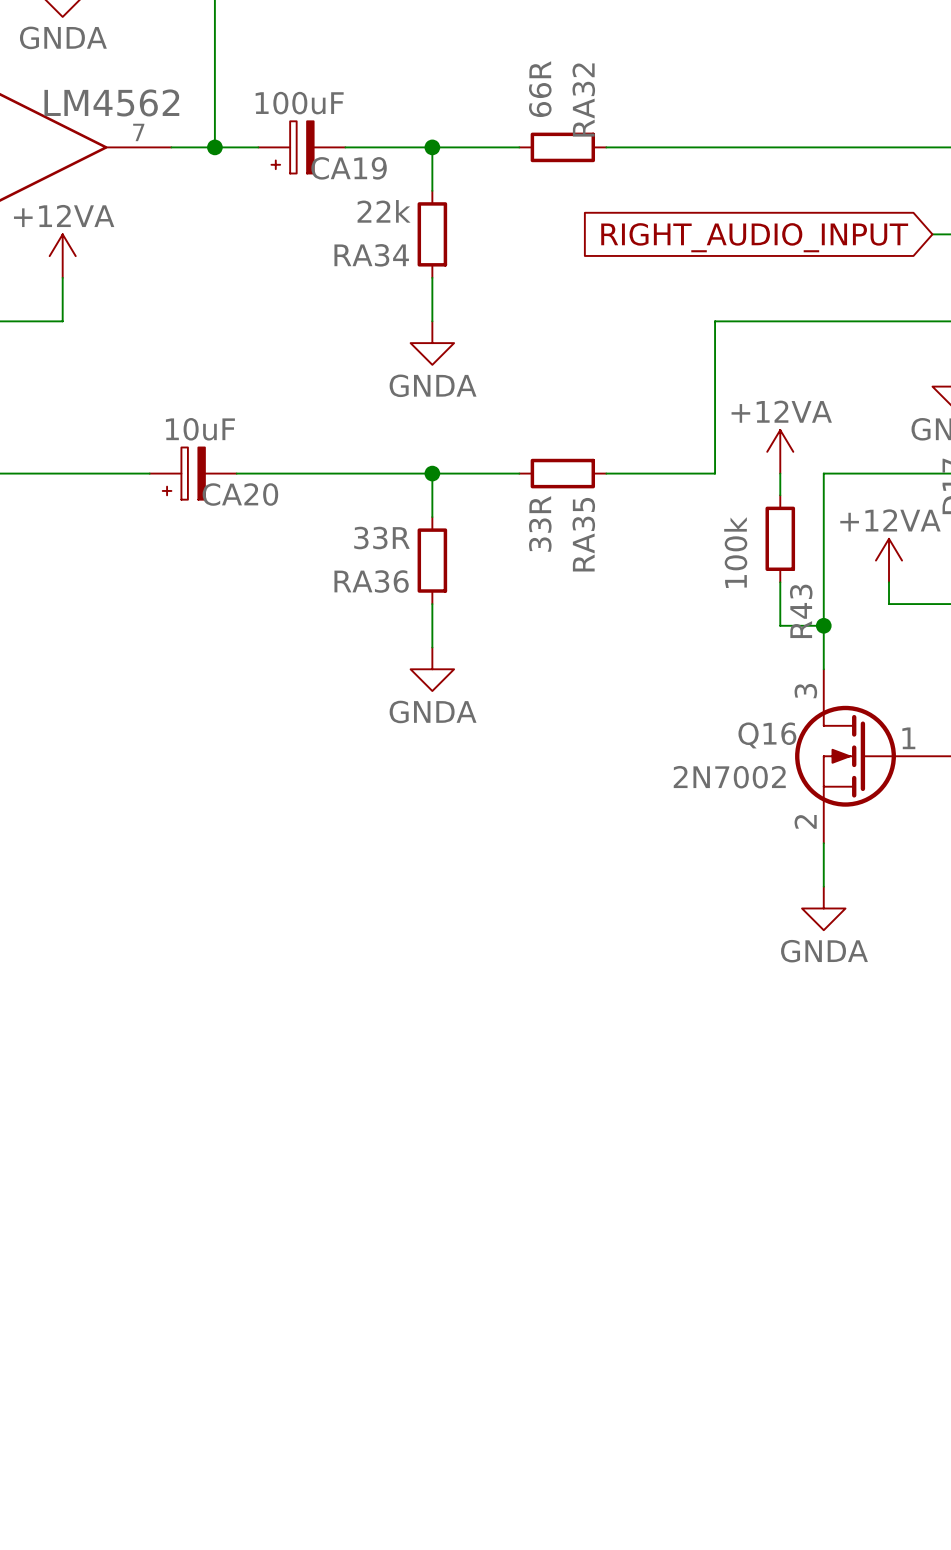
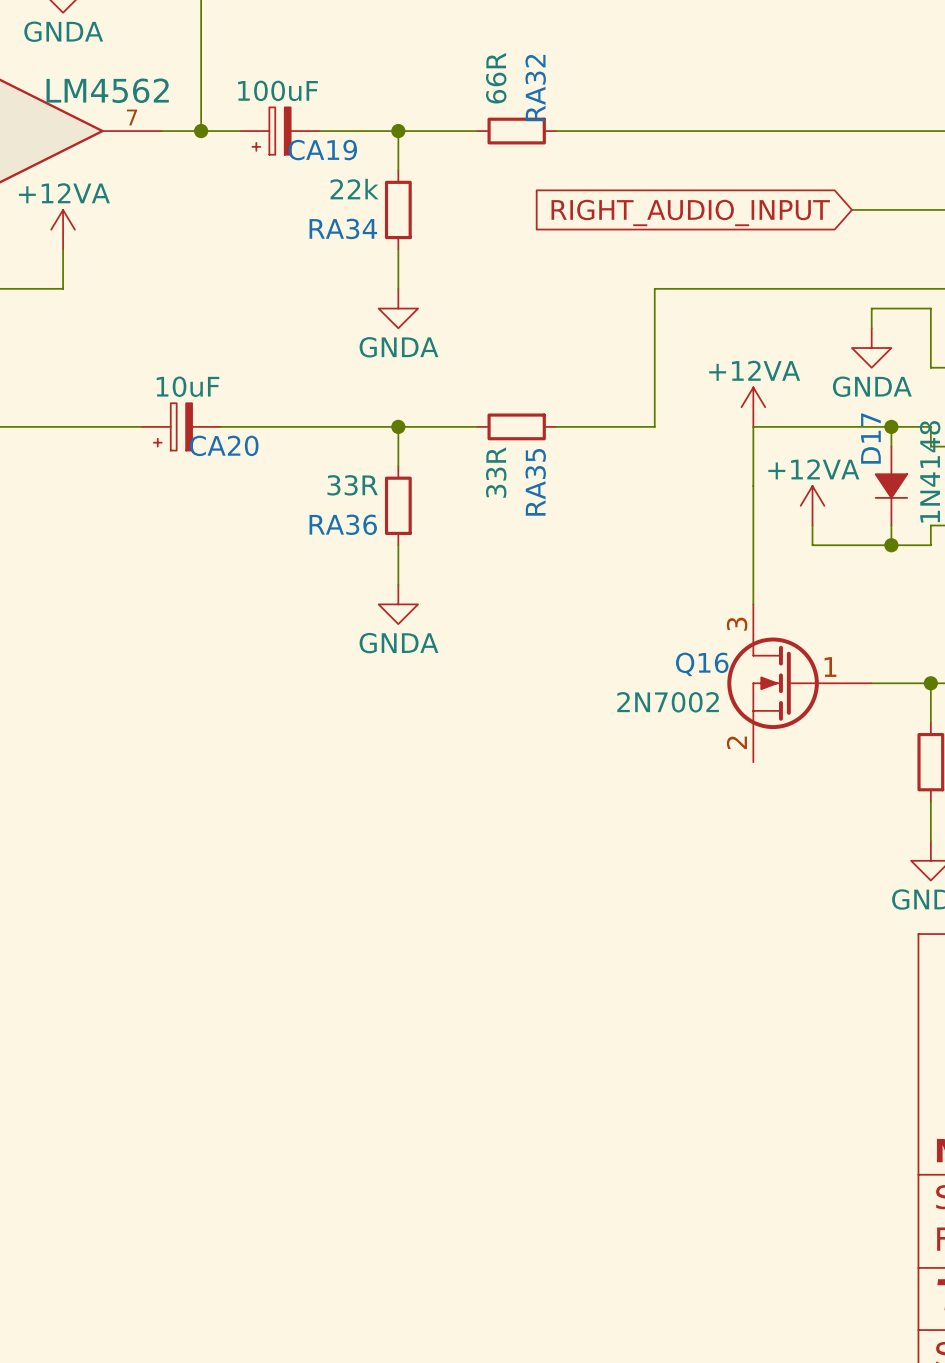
power symbol position: +12VA (780, 451) -> +12VA (753, 407)
wire: (780, 473) (780, 495) -> none
R43: 100k (780, 538) -> none
wire: (780, 582) (780, 625) (823, 625) -> none
junction: (823, 625) -> none
wire: (823, 843) (823, 886) -> none
power symbol: GNDA (823, 908) -> none

